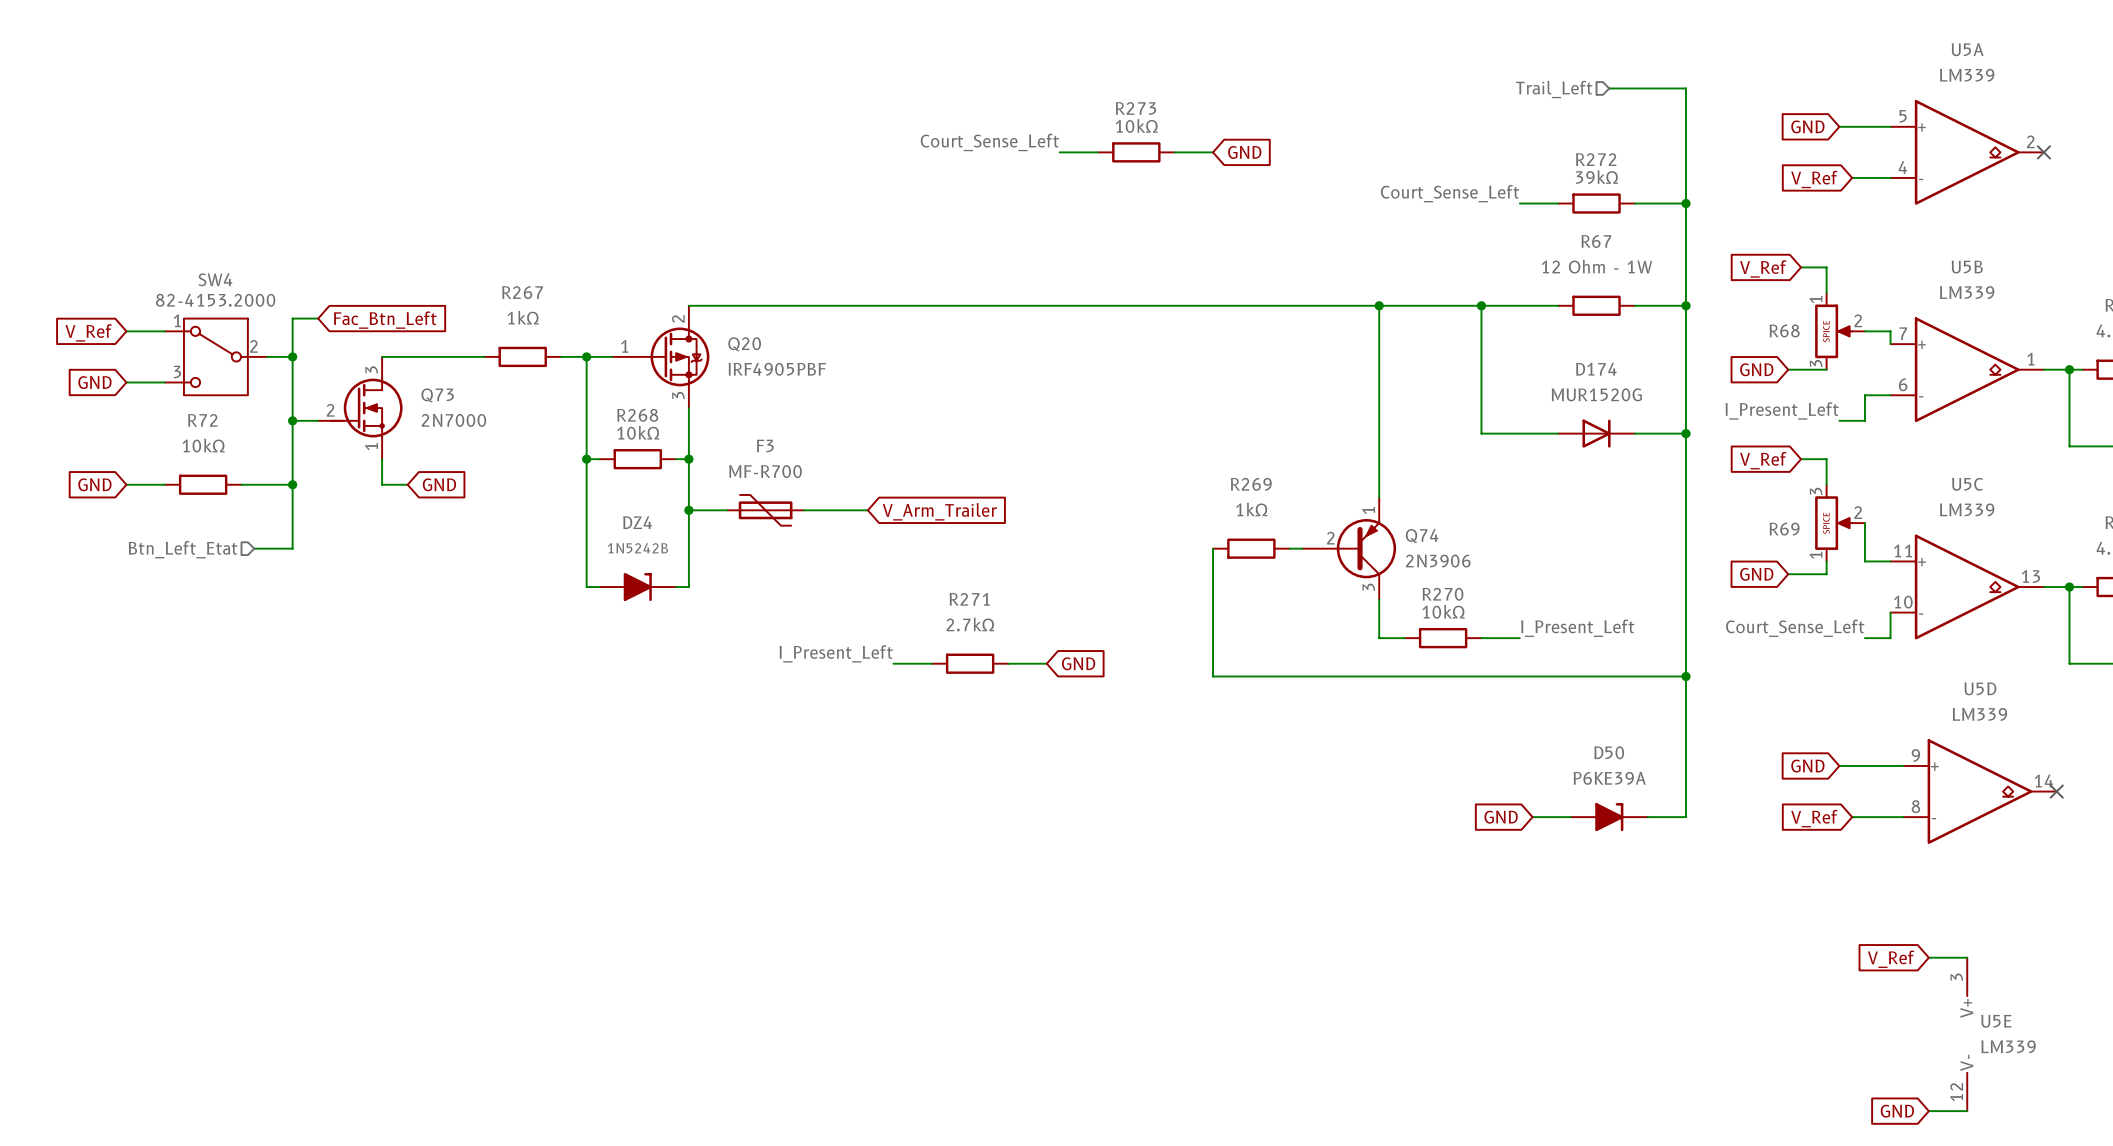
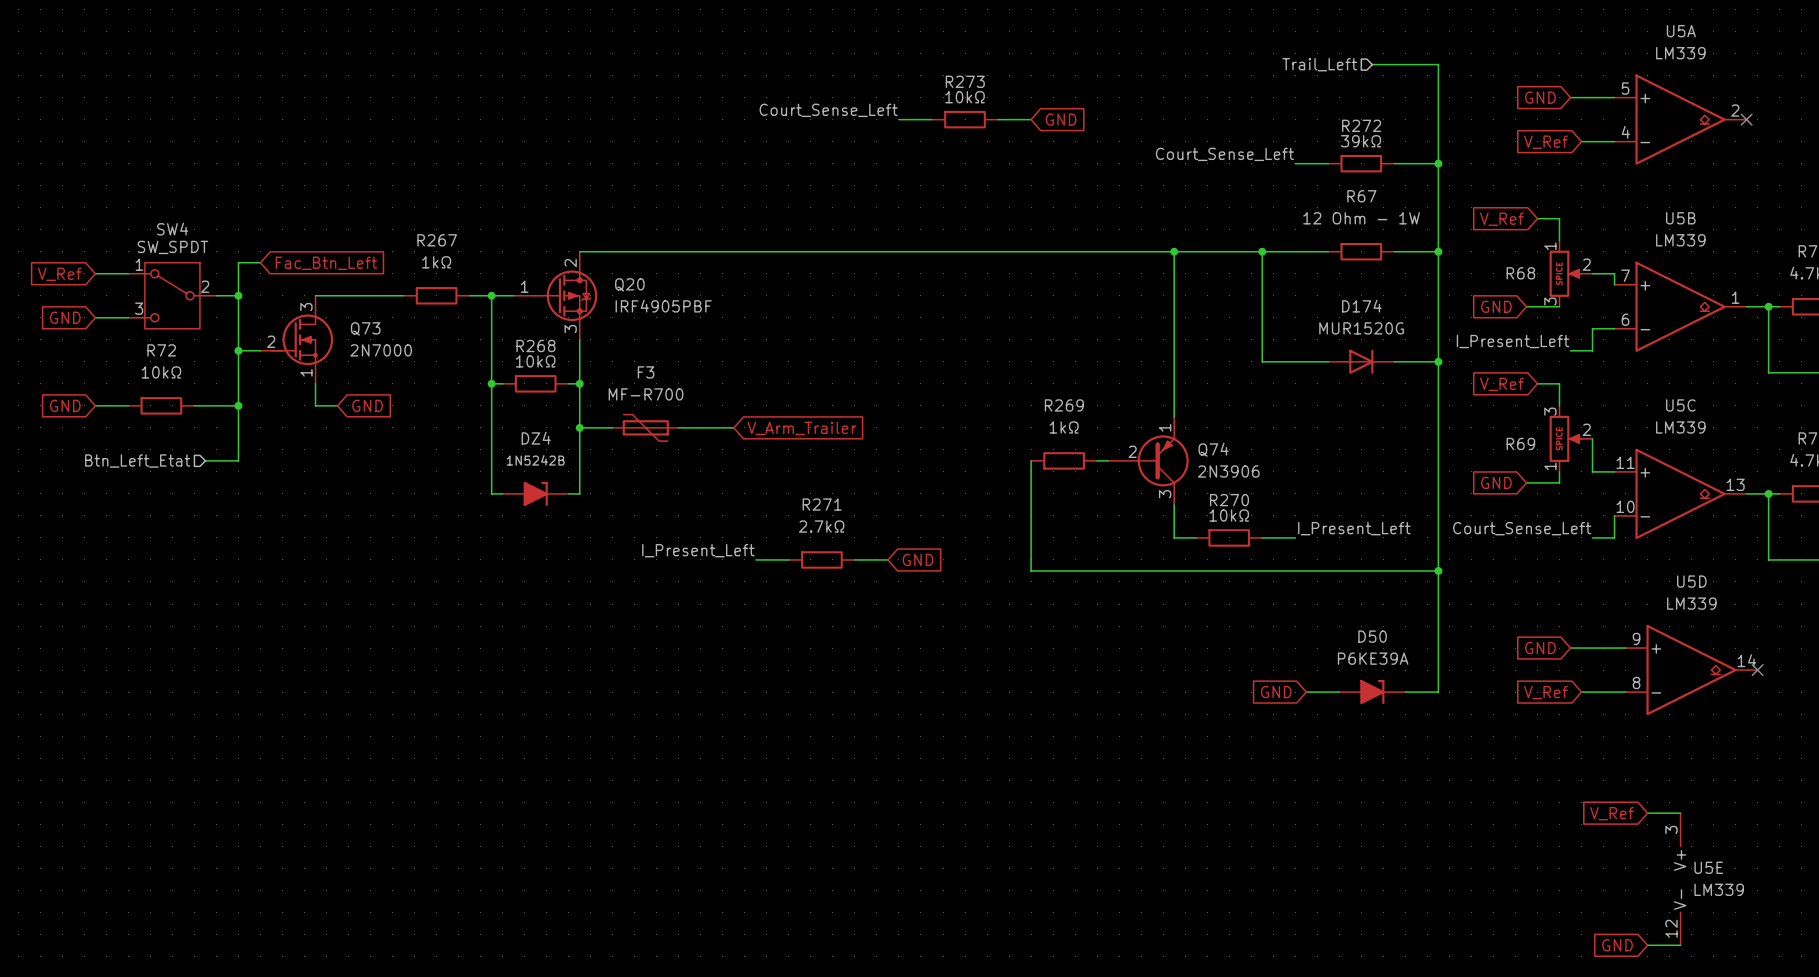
SW4 value: 82-4153.2000 (215, 300) -> SW_SPDT (172, 247)

